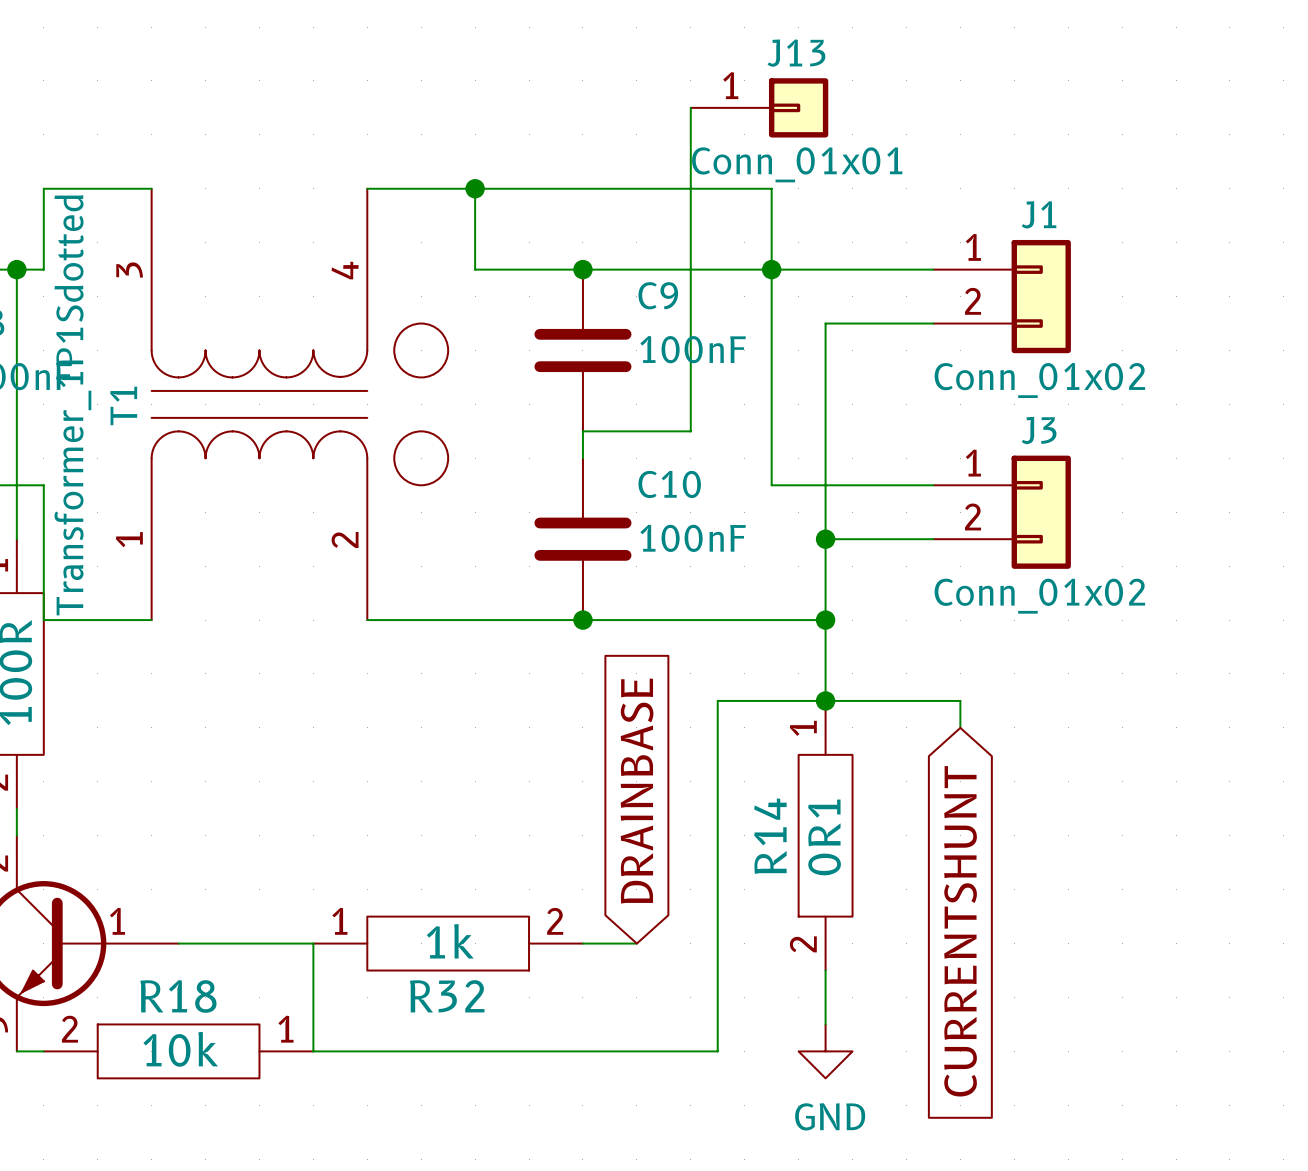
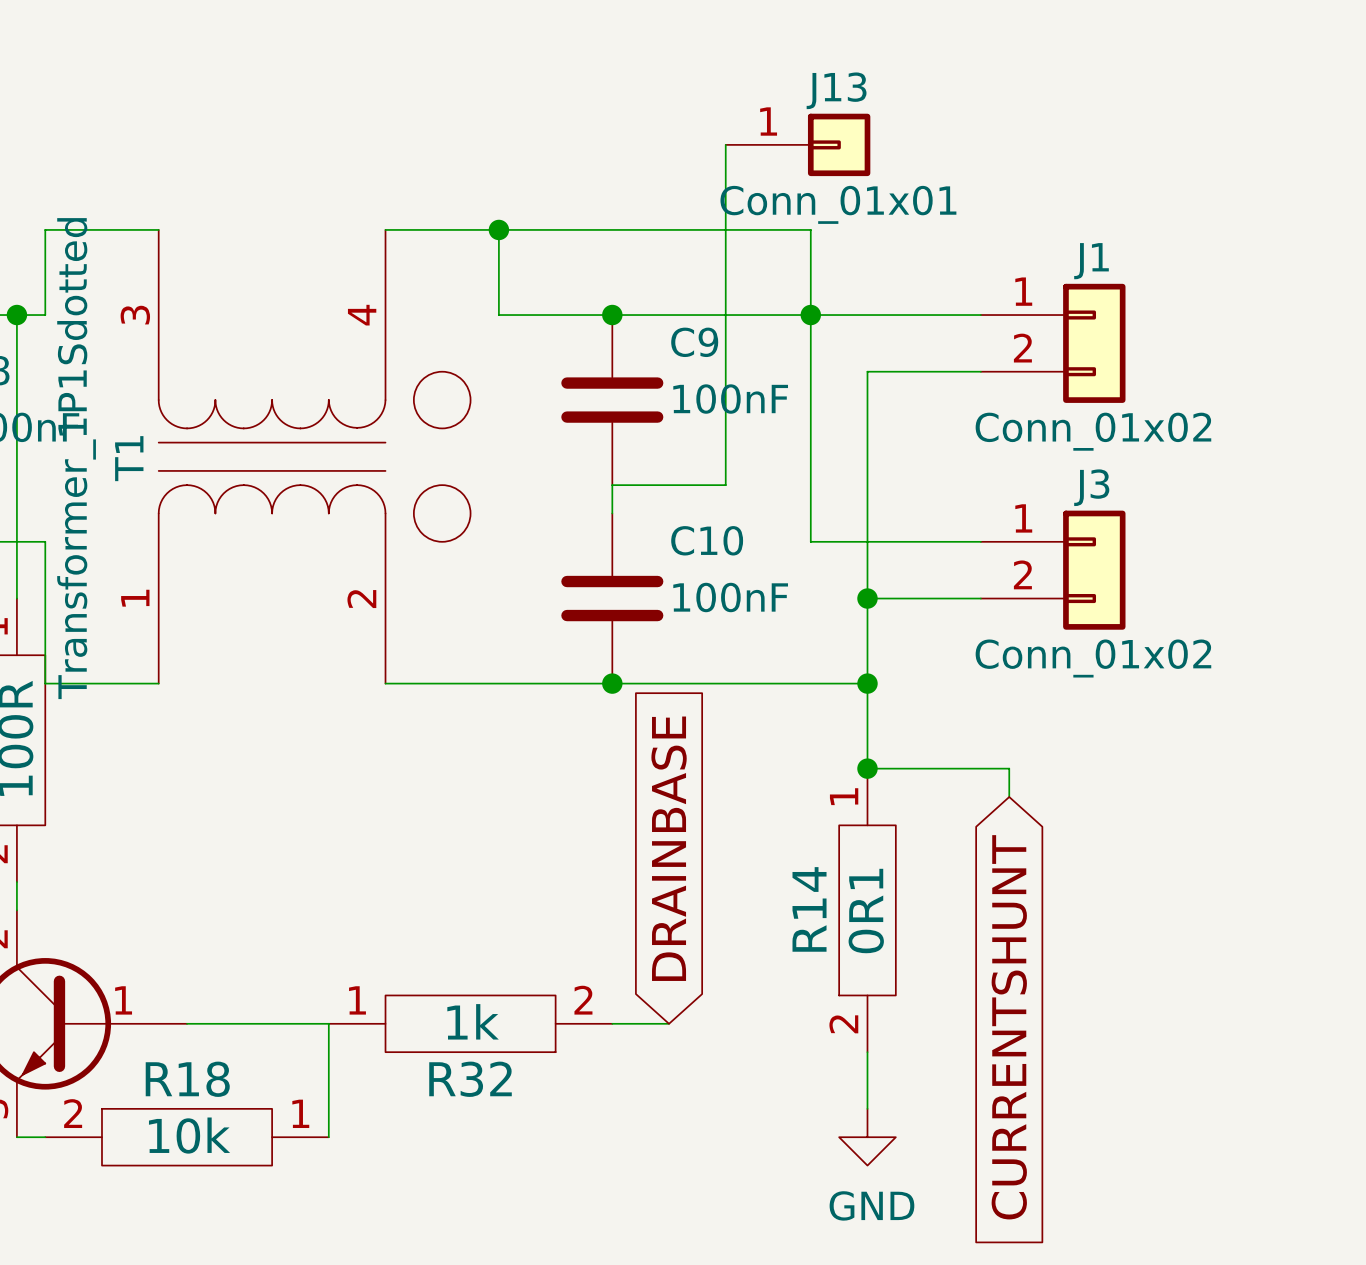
wire: (825, 700) (717, 700) (717, 1051) (313, 1051) -> none

